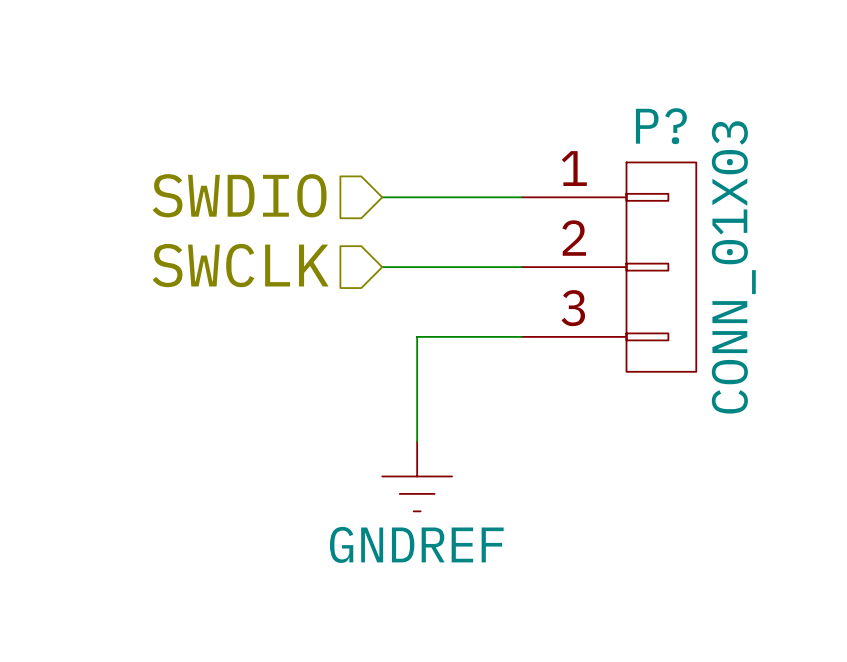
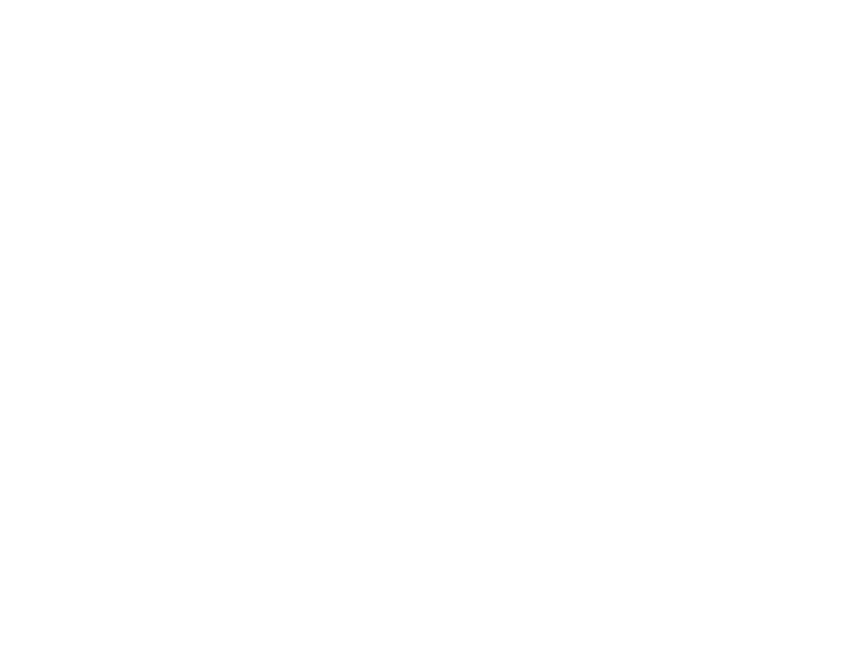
hierarchical label: SWDIO (239, 195) -> none
wire: (382, 197) (521, 197) -> none
hierarchical label: SWCLK (240, 265) -> none
wire: (382, 267) (521, 267) -> none
P?: CONN_01X03 (609, 267) -> none
wire: (521, 336) (417, 336) (417, 441) -> none
power symbol: GNDREF (417, 476) -> none

